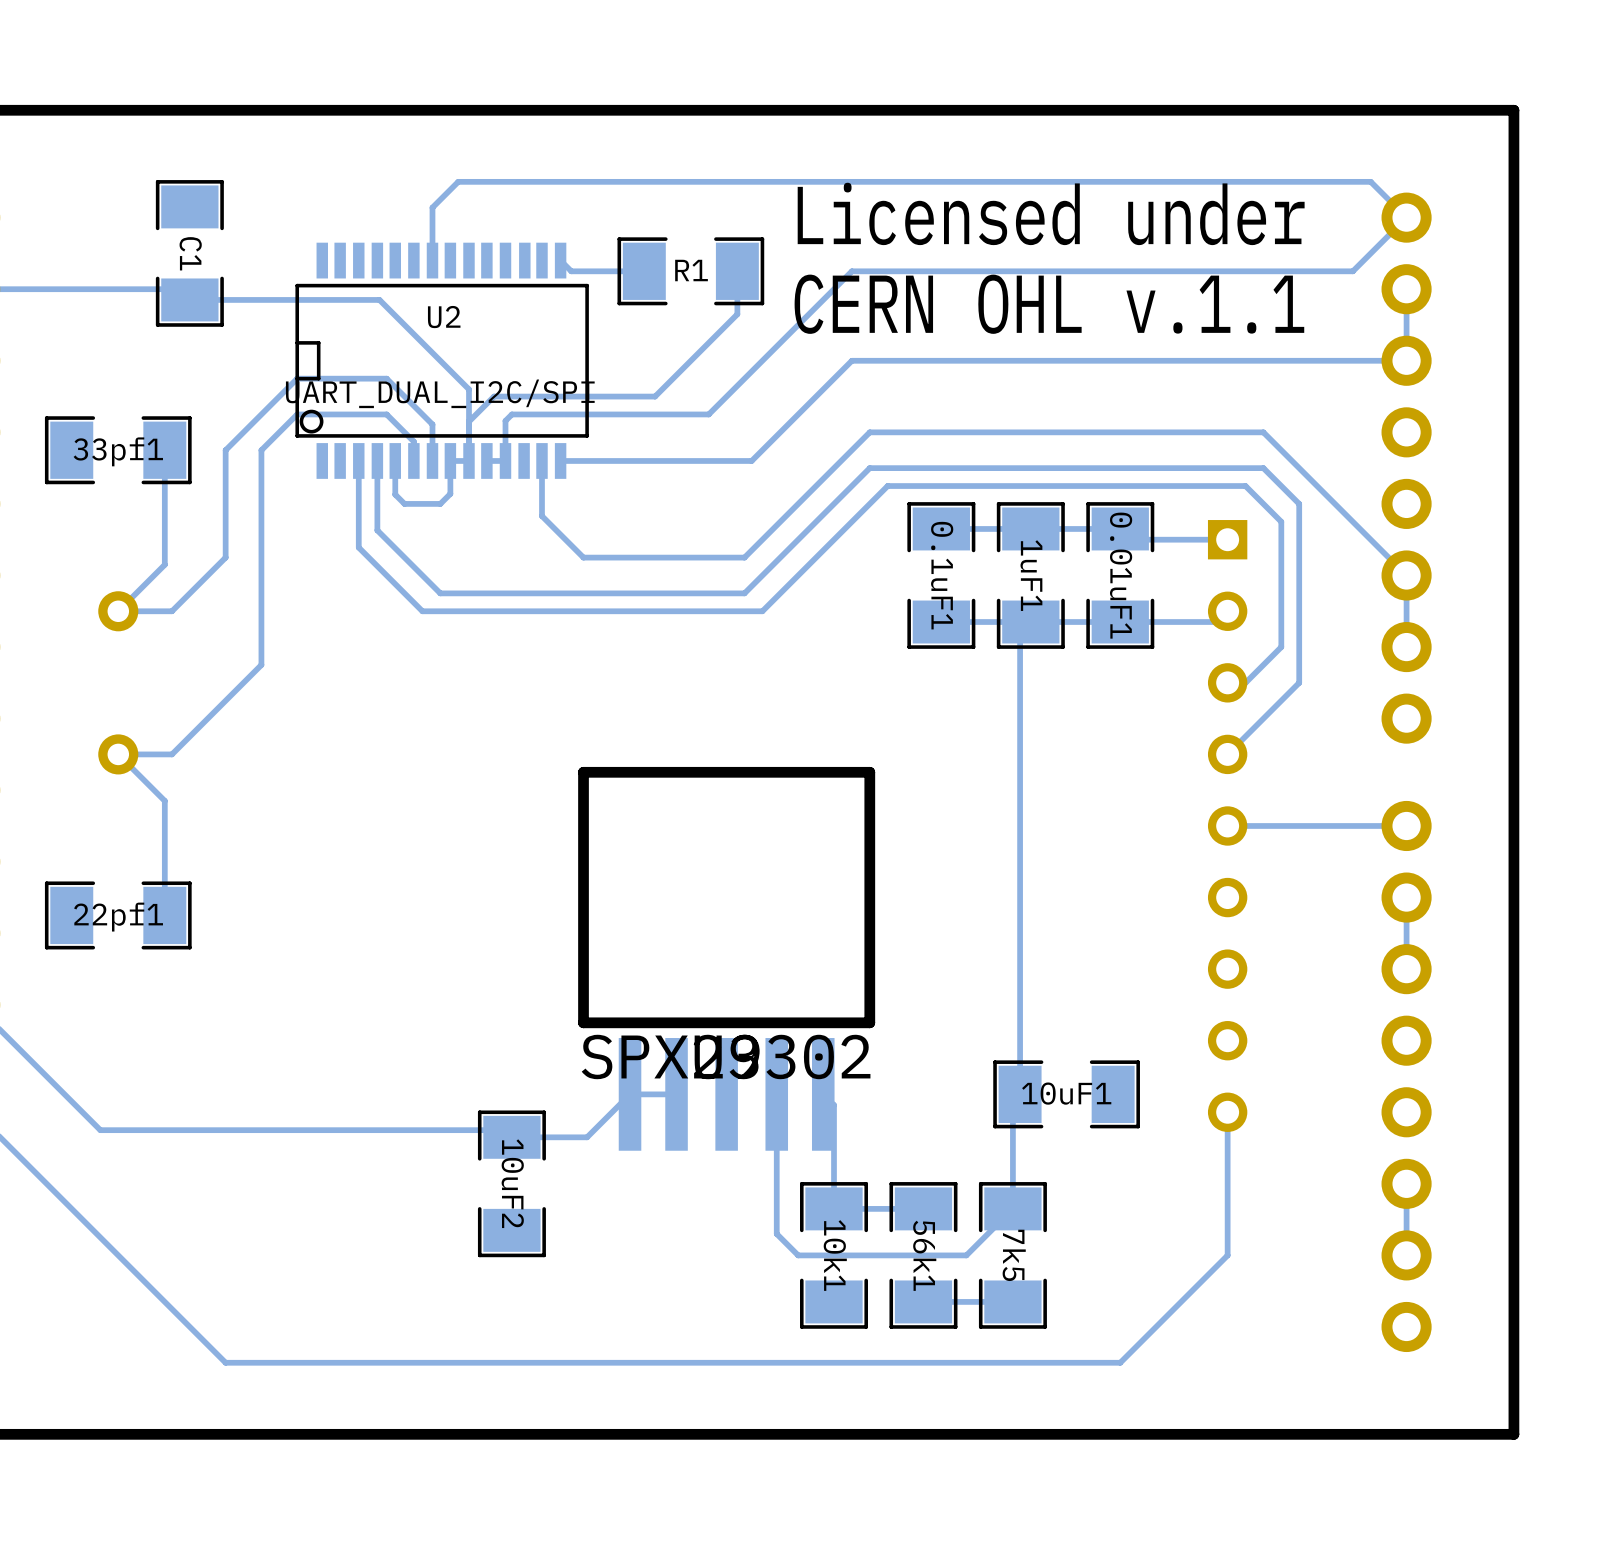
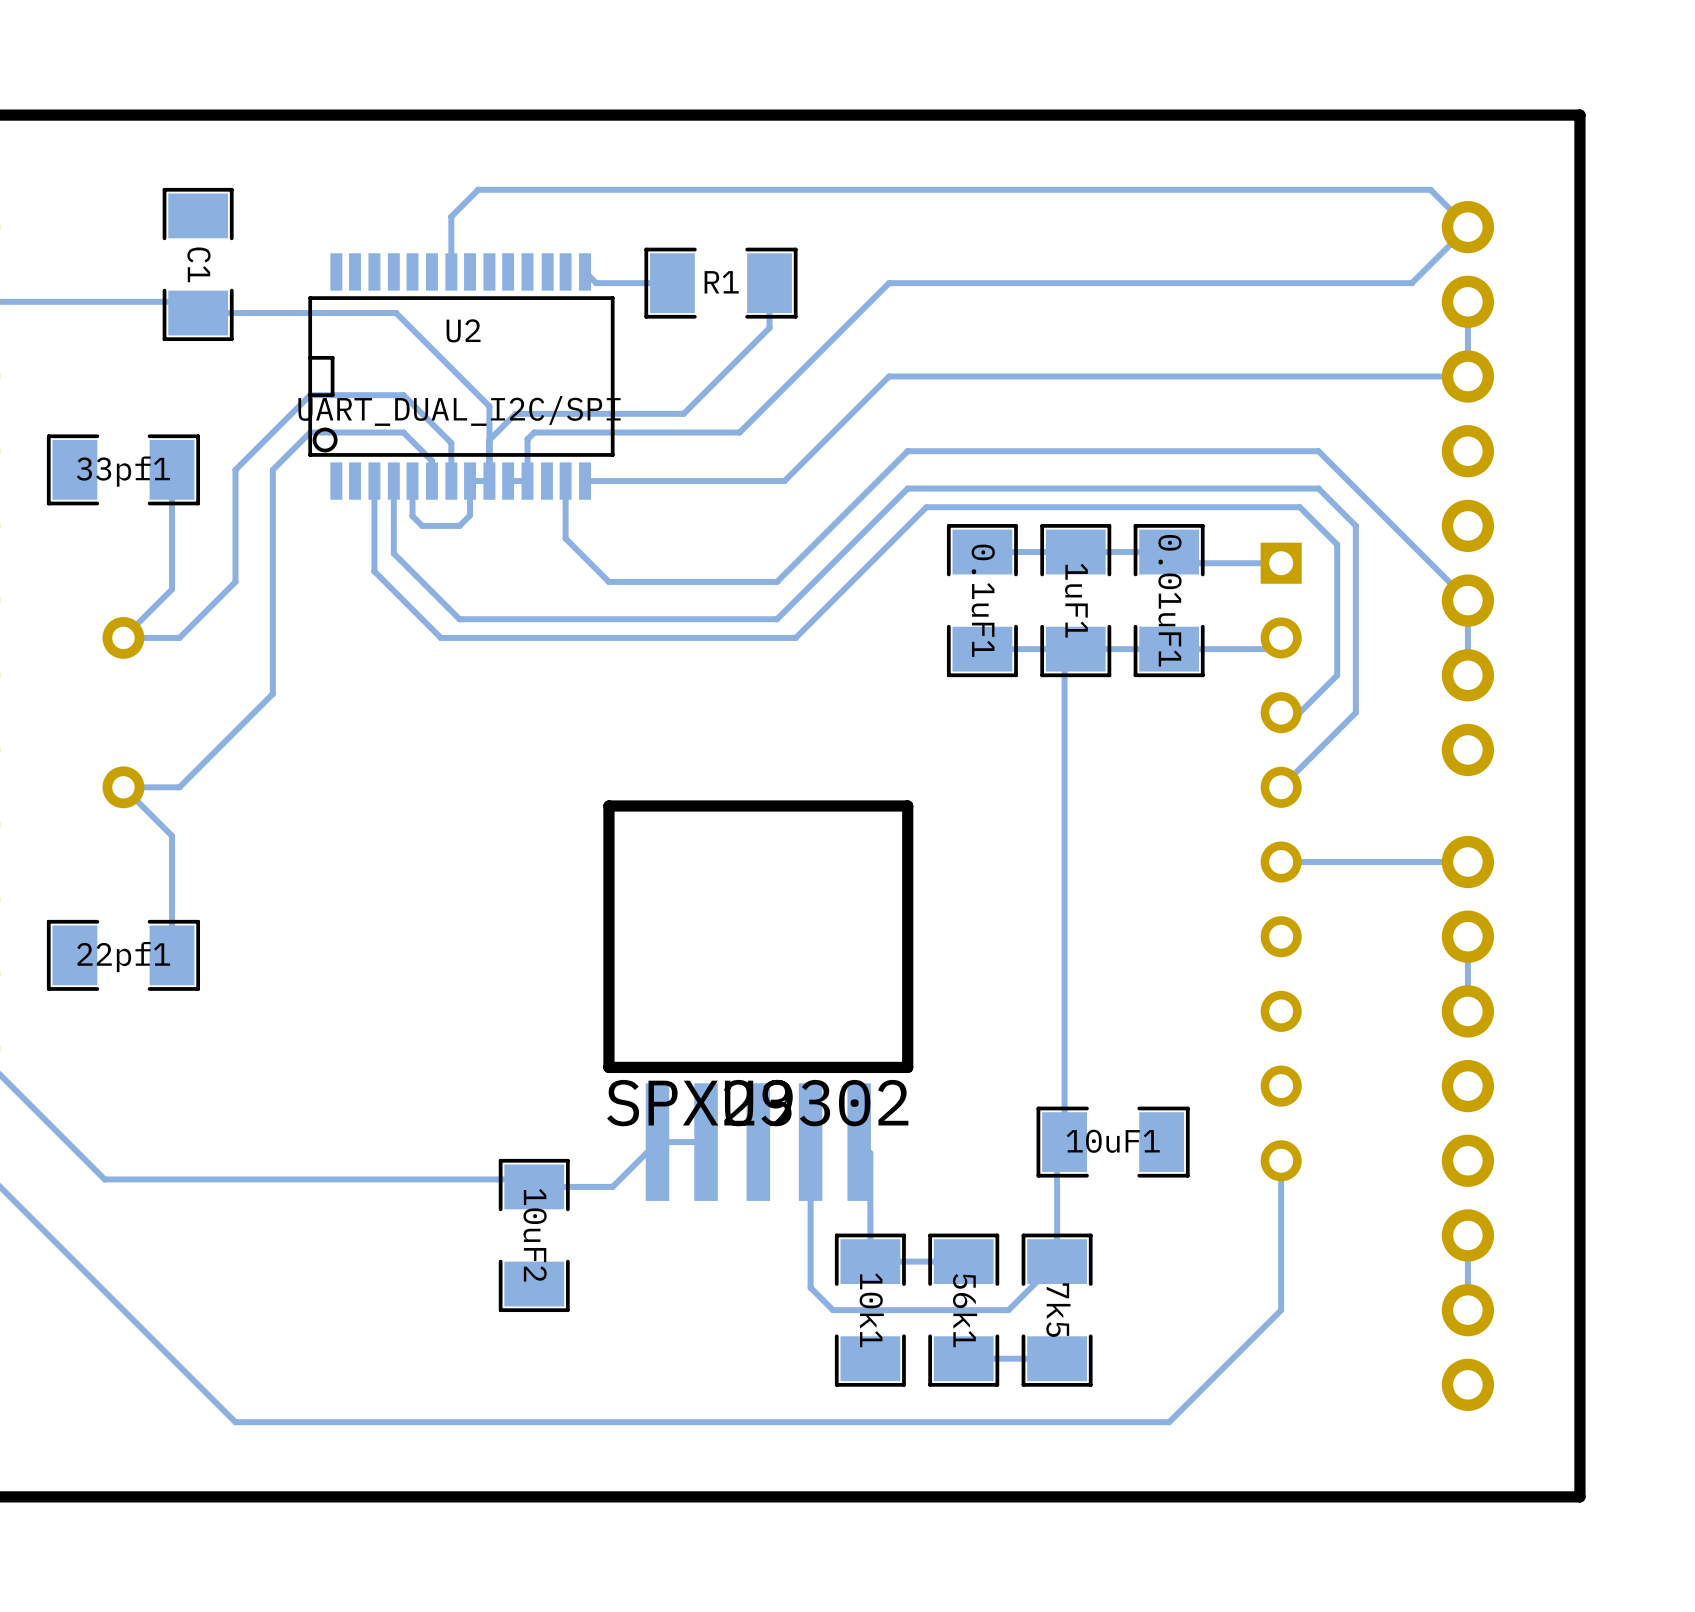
text: Licensed under (1051, 213) -> none
text: CERN OHL v.1.1 (1049, 304) -> none

